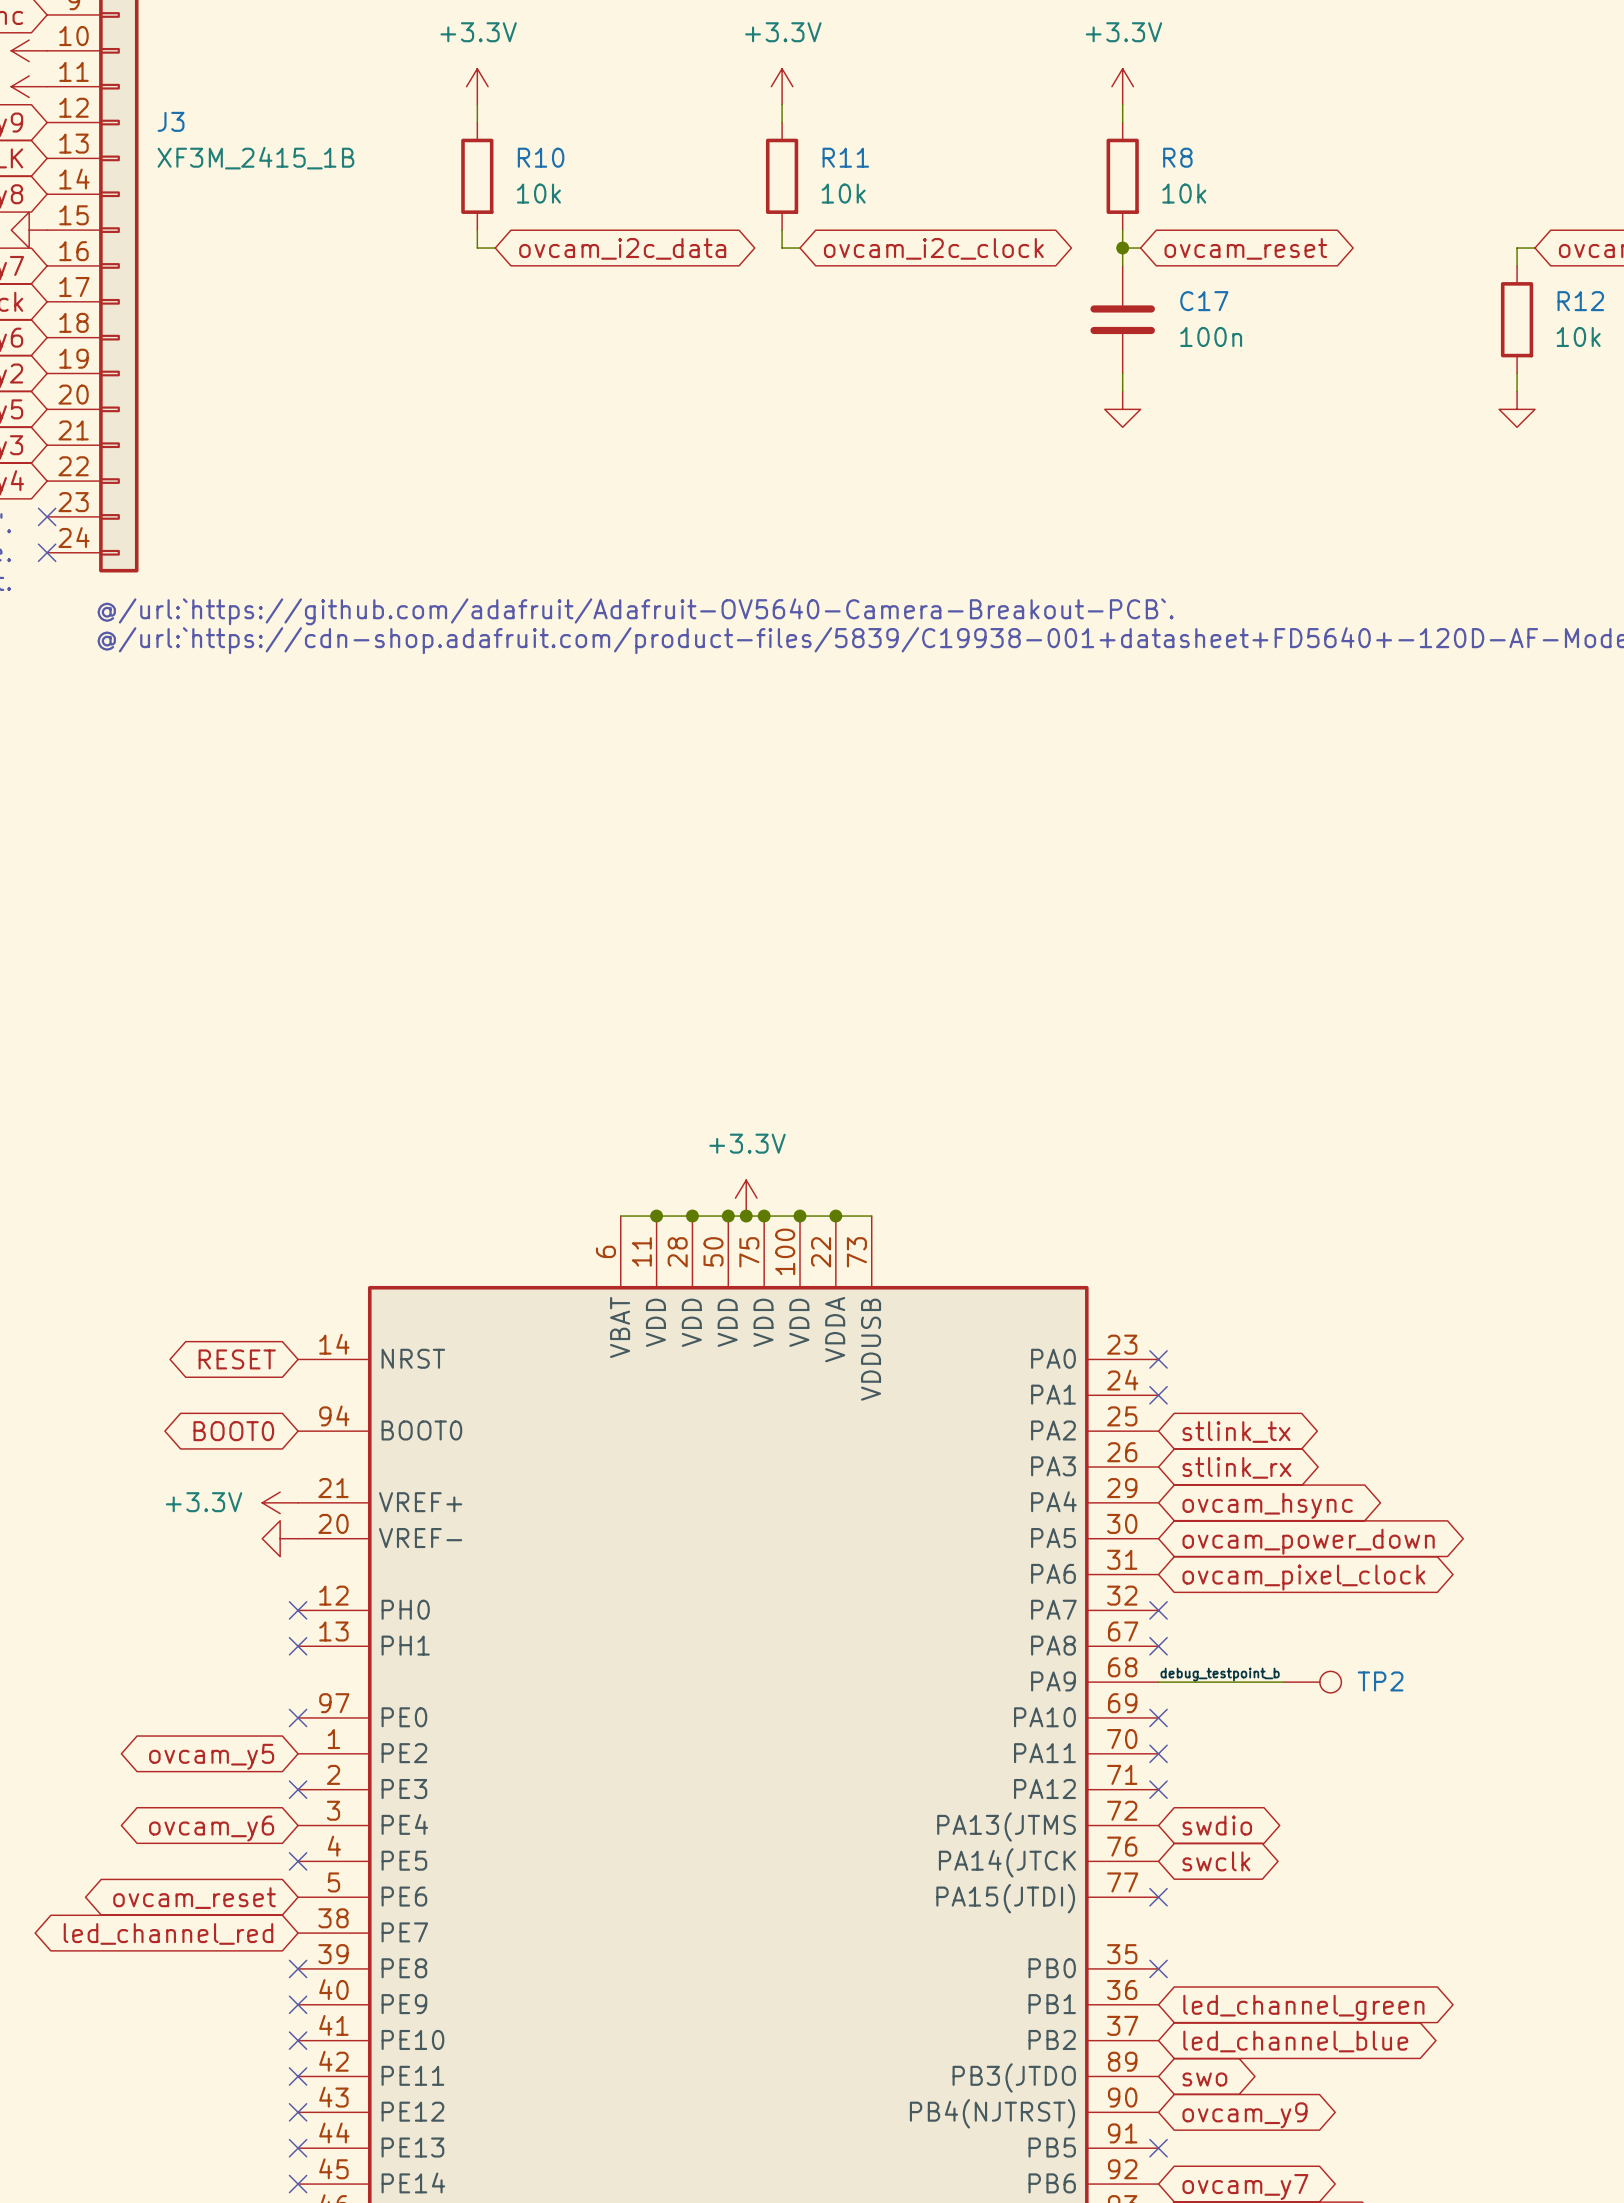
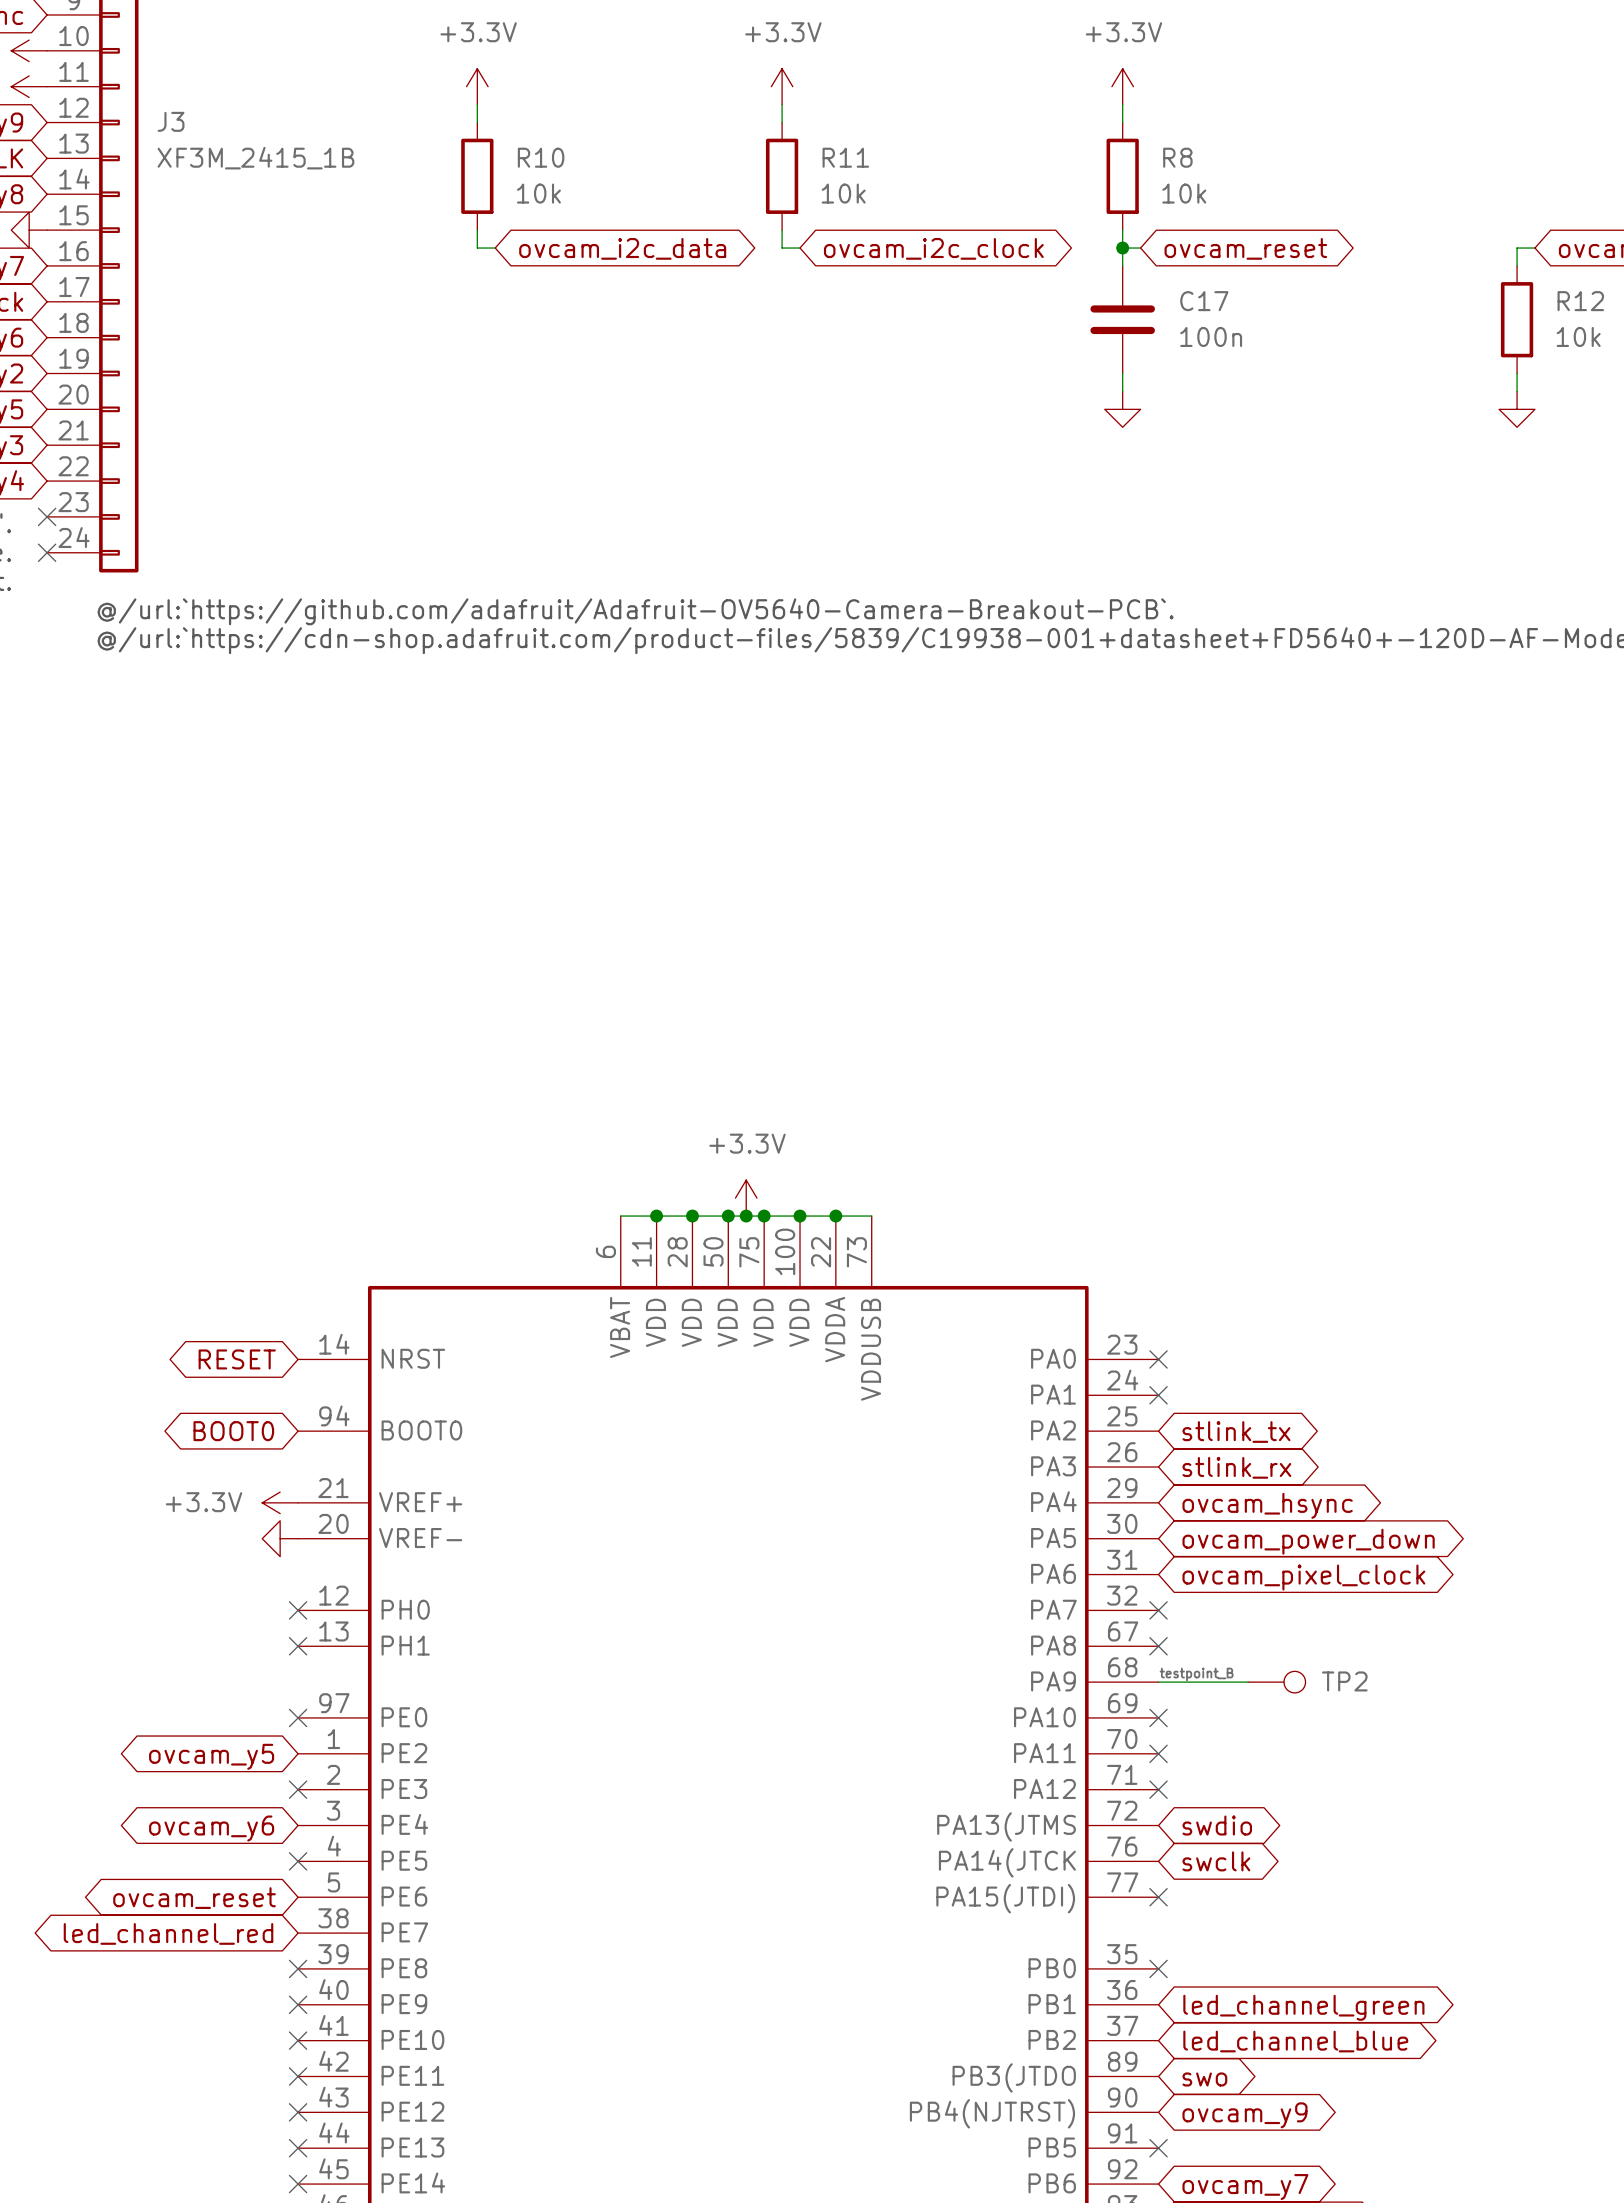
label: debug_testpoint_b (1220, 1674) -> testpoint_B (1196, 1674)
TP2 position: (1312, 1682) -> (1276, 1682)

